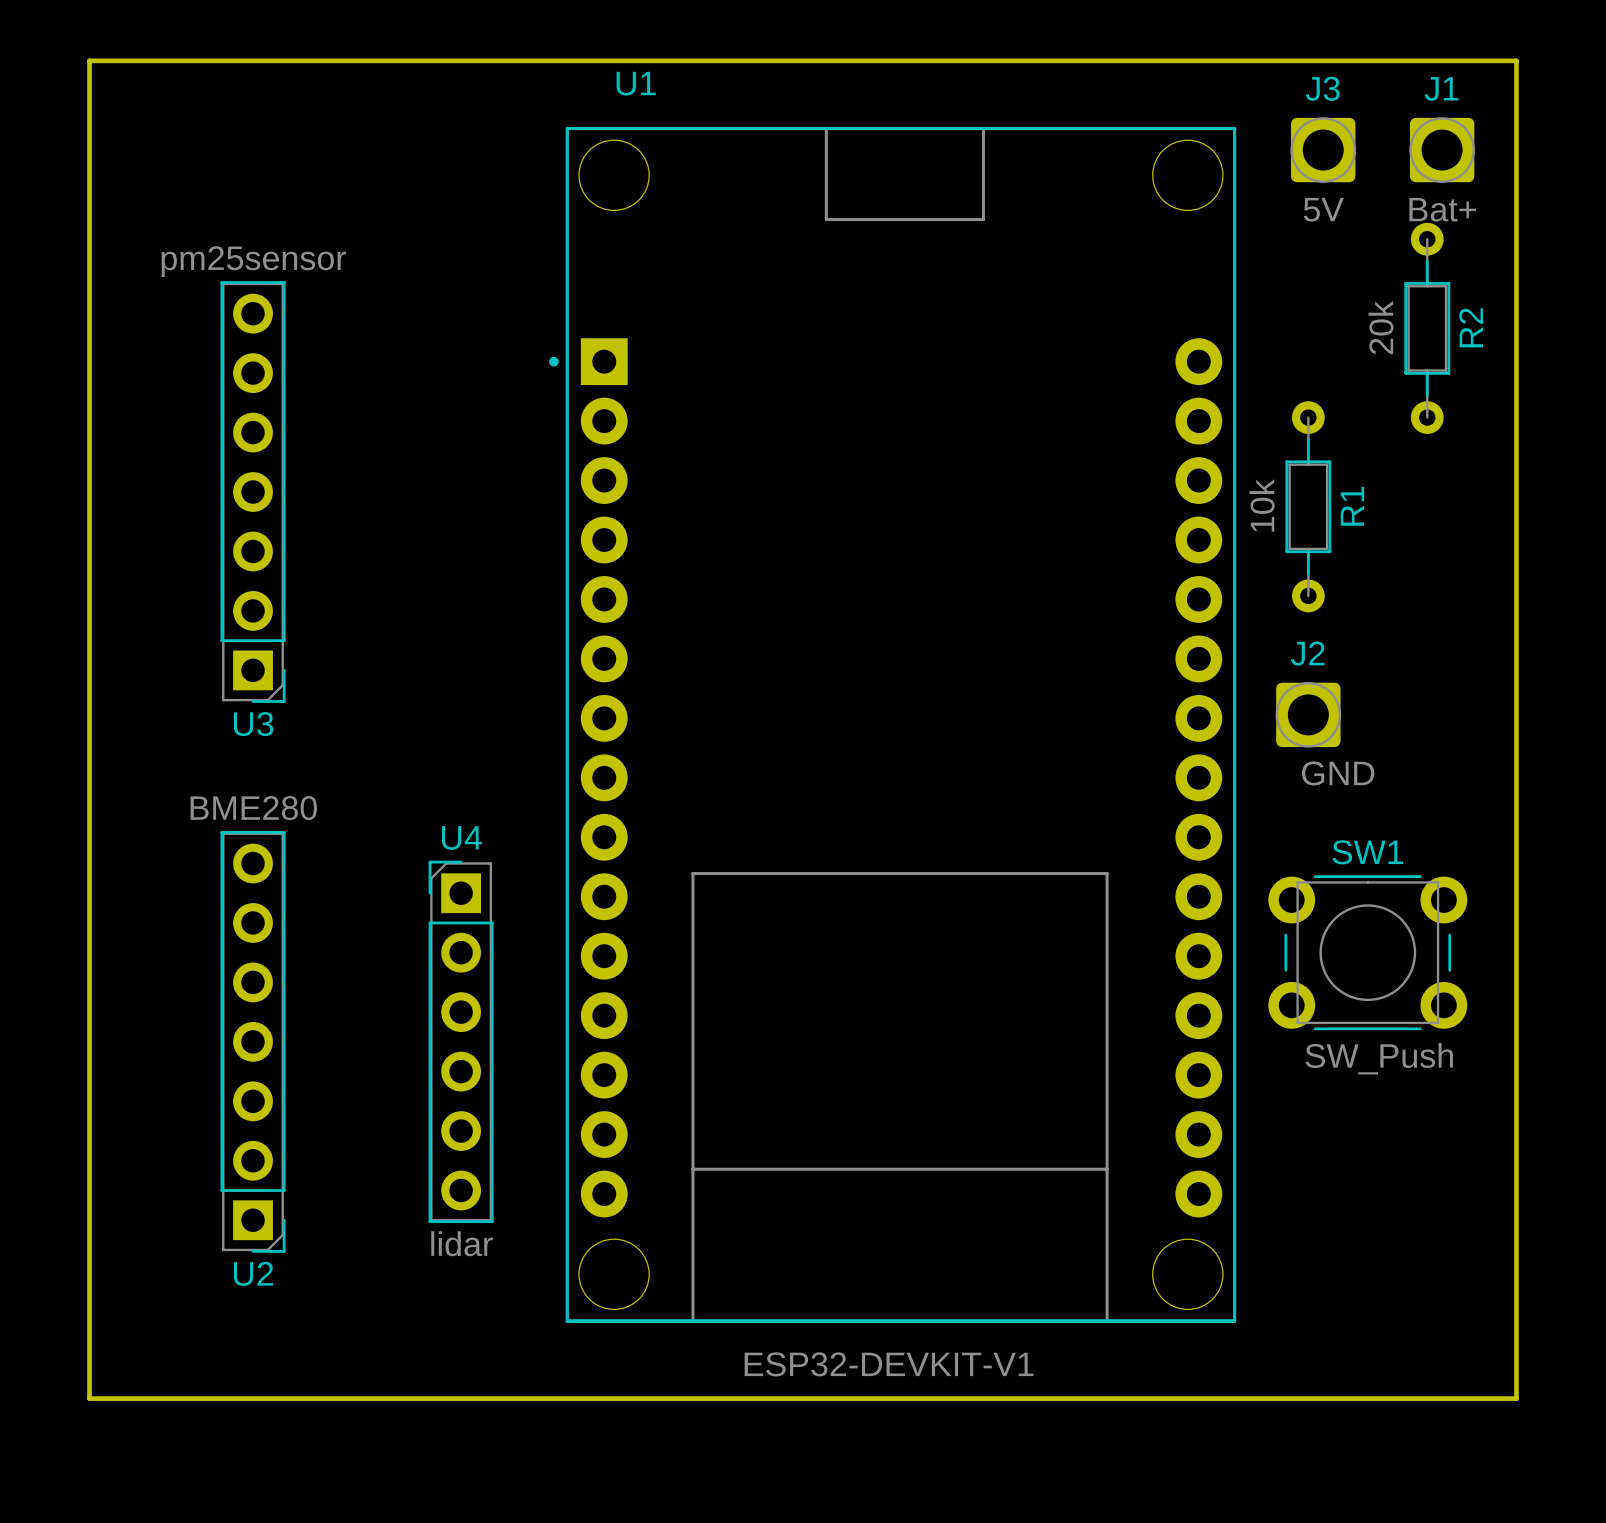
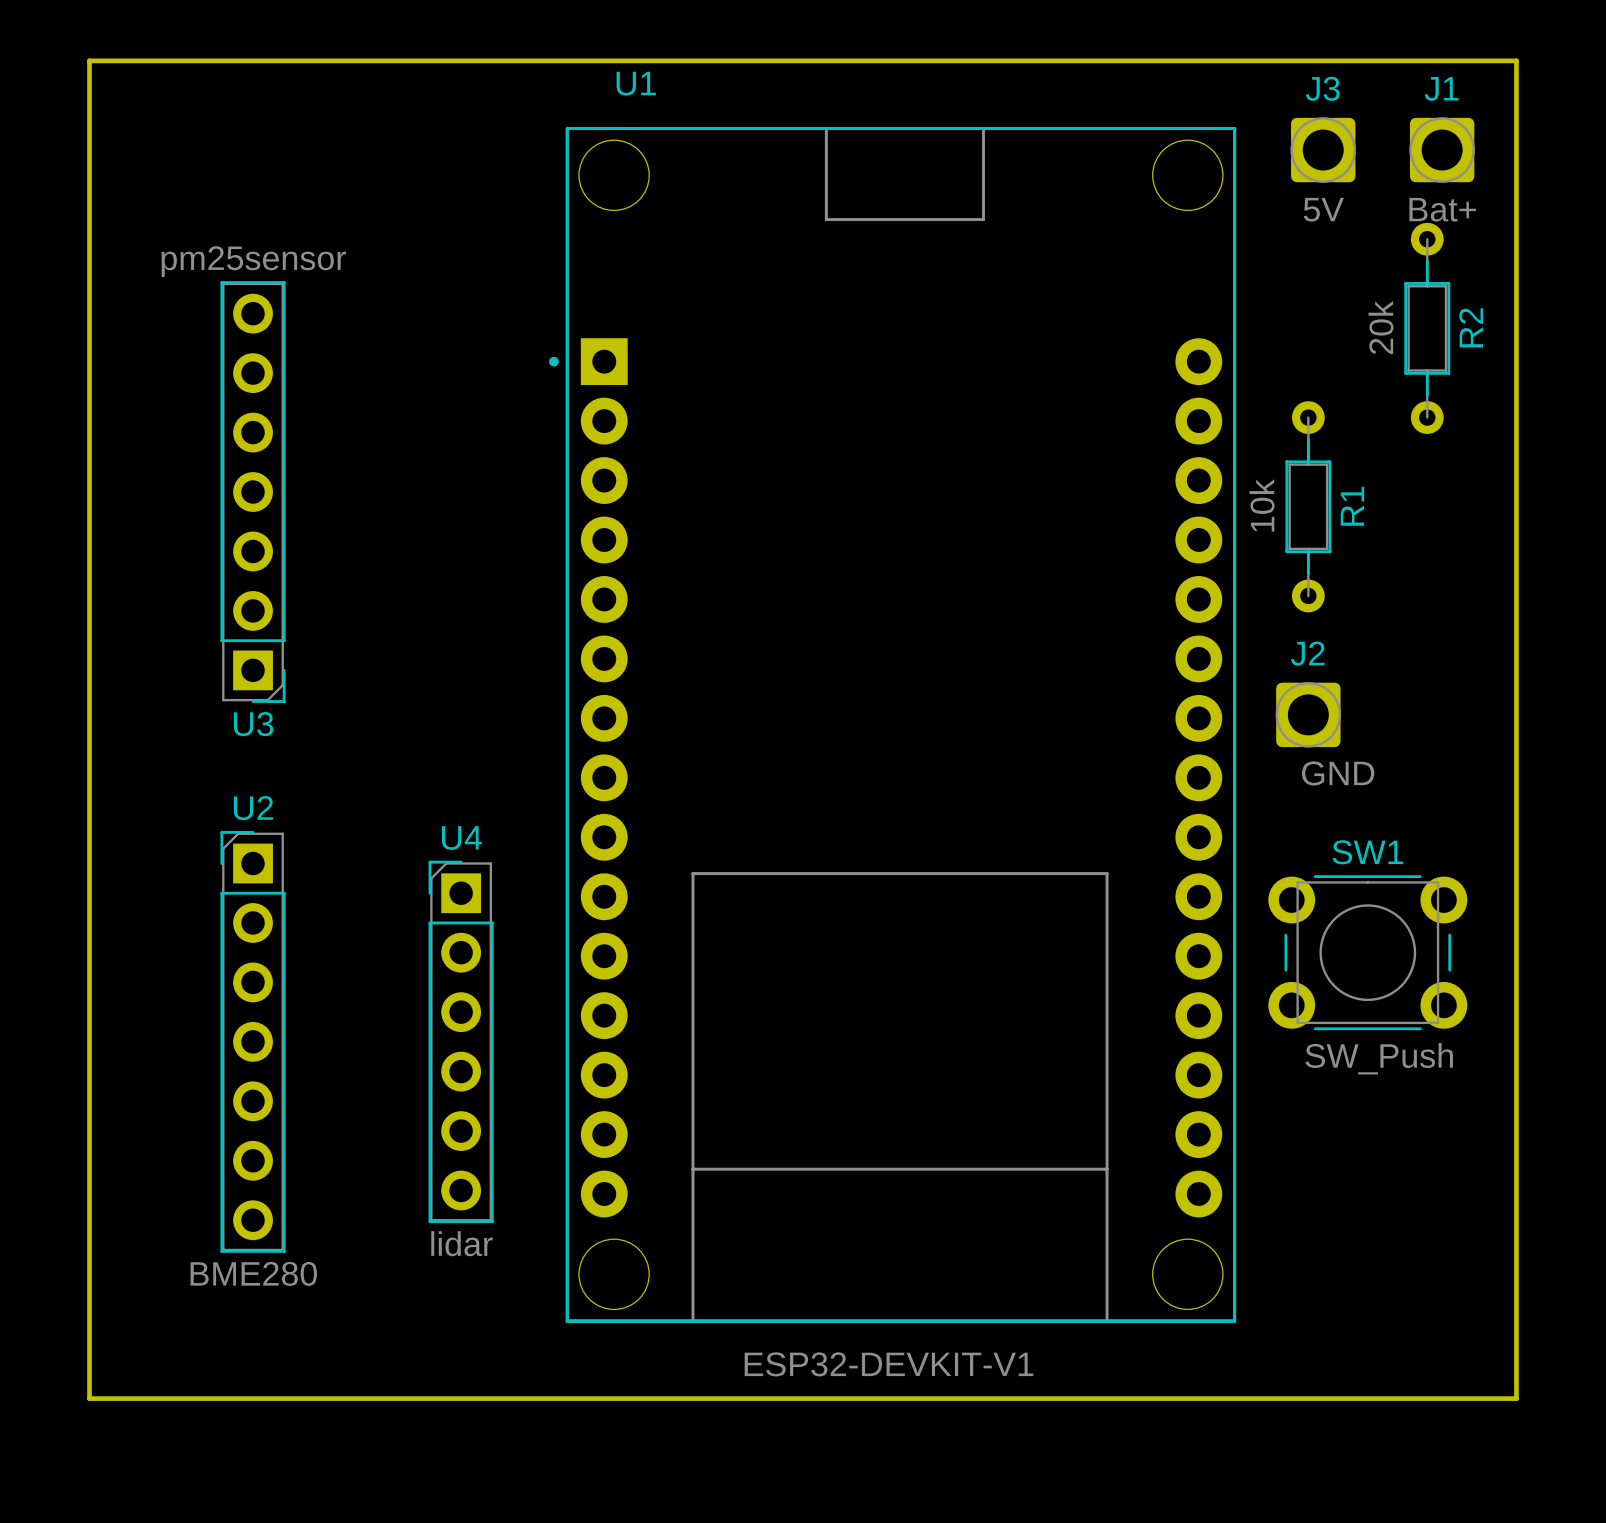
U2 rotation: 0° (253, 1041) -> 180° (253, 1041)

